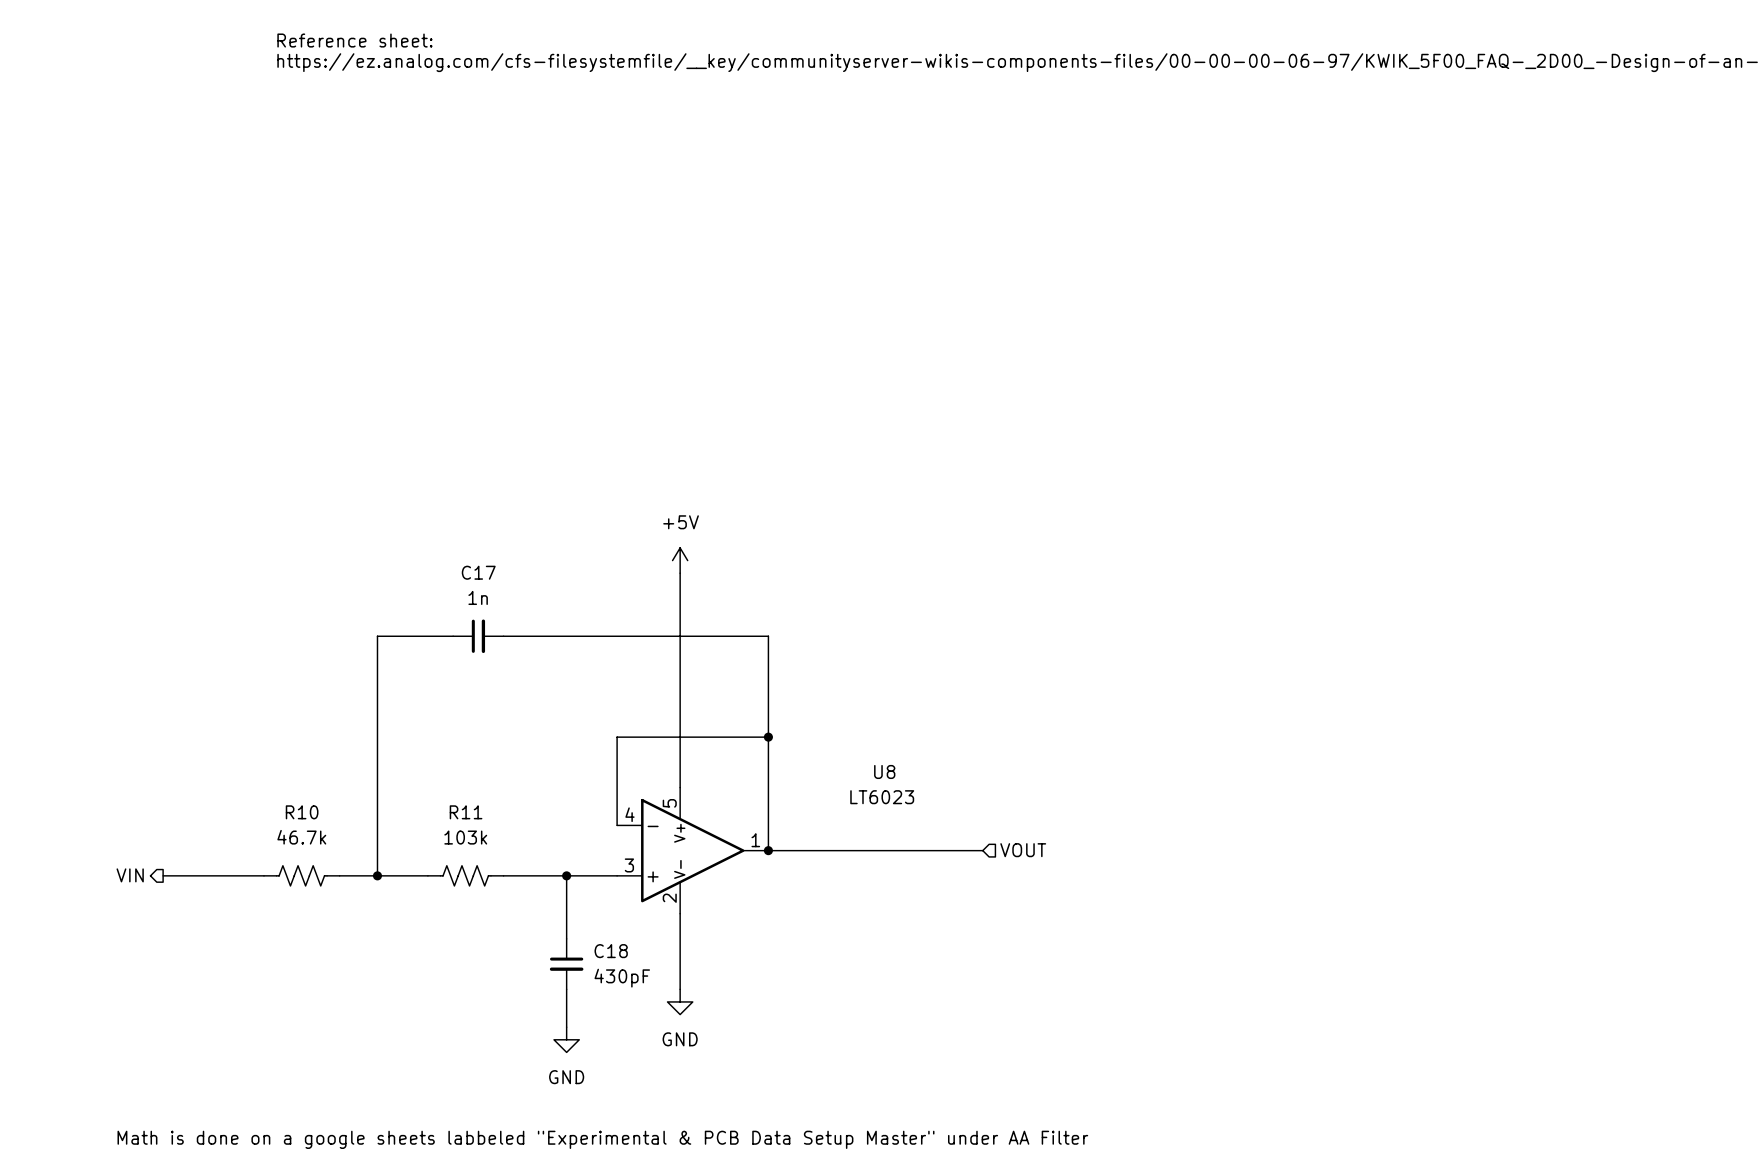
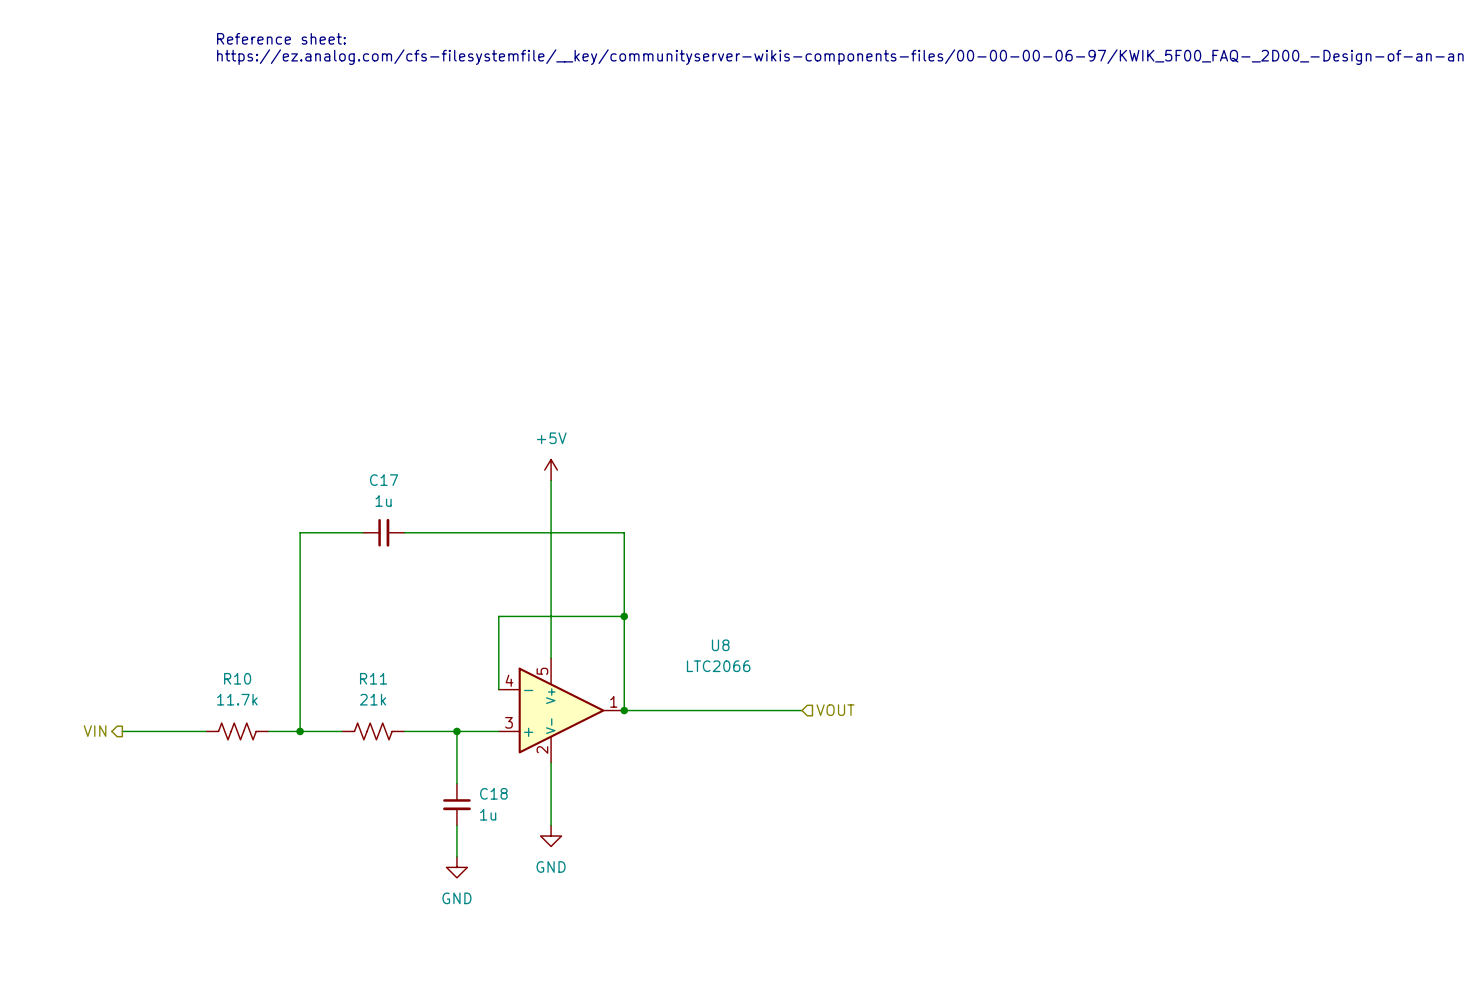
C17 value: 1n (478, 597) -> 1u (383, 501)
U8 value: LT6023 (882, 797) -> LTC2066 (718, 666)
R10 value: 46.7k (301, 837) -> 11.7k (237, 699)
R11 value: 103k (465, 837) -> 21k (373, 699)
C18 value: 430pF (622, 978) -> 1u (488, 814)
text: Math is done on a google sheets labbeled "Experimental & PCB Data Setup Master" under AA Filter (602, 1139) -> none

